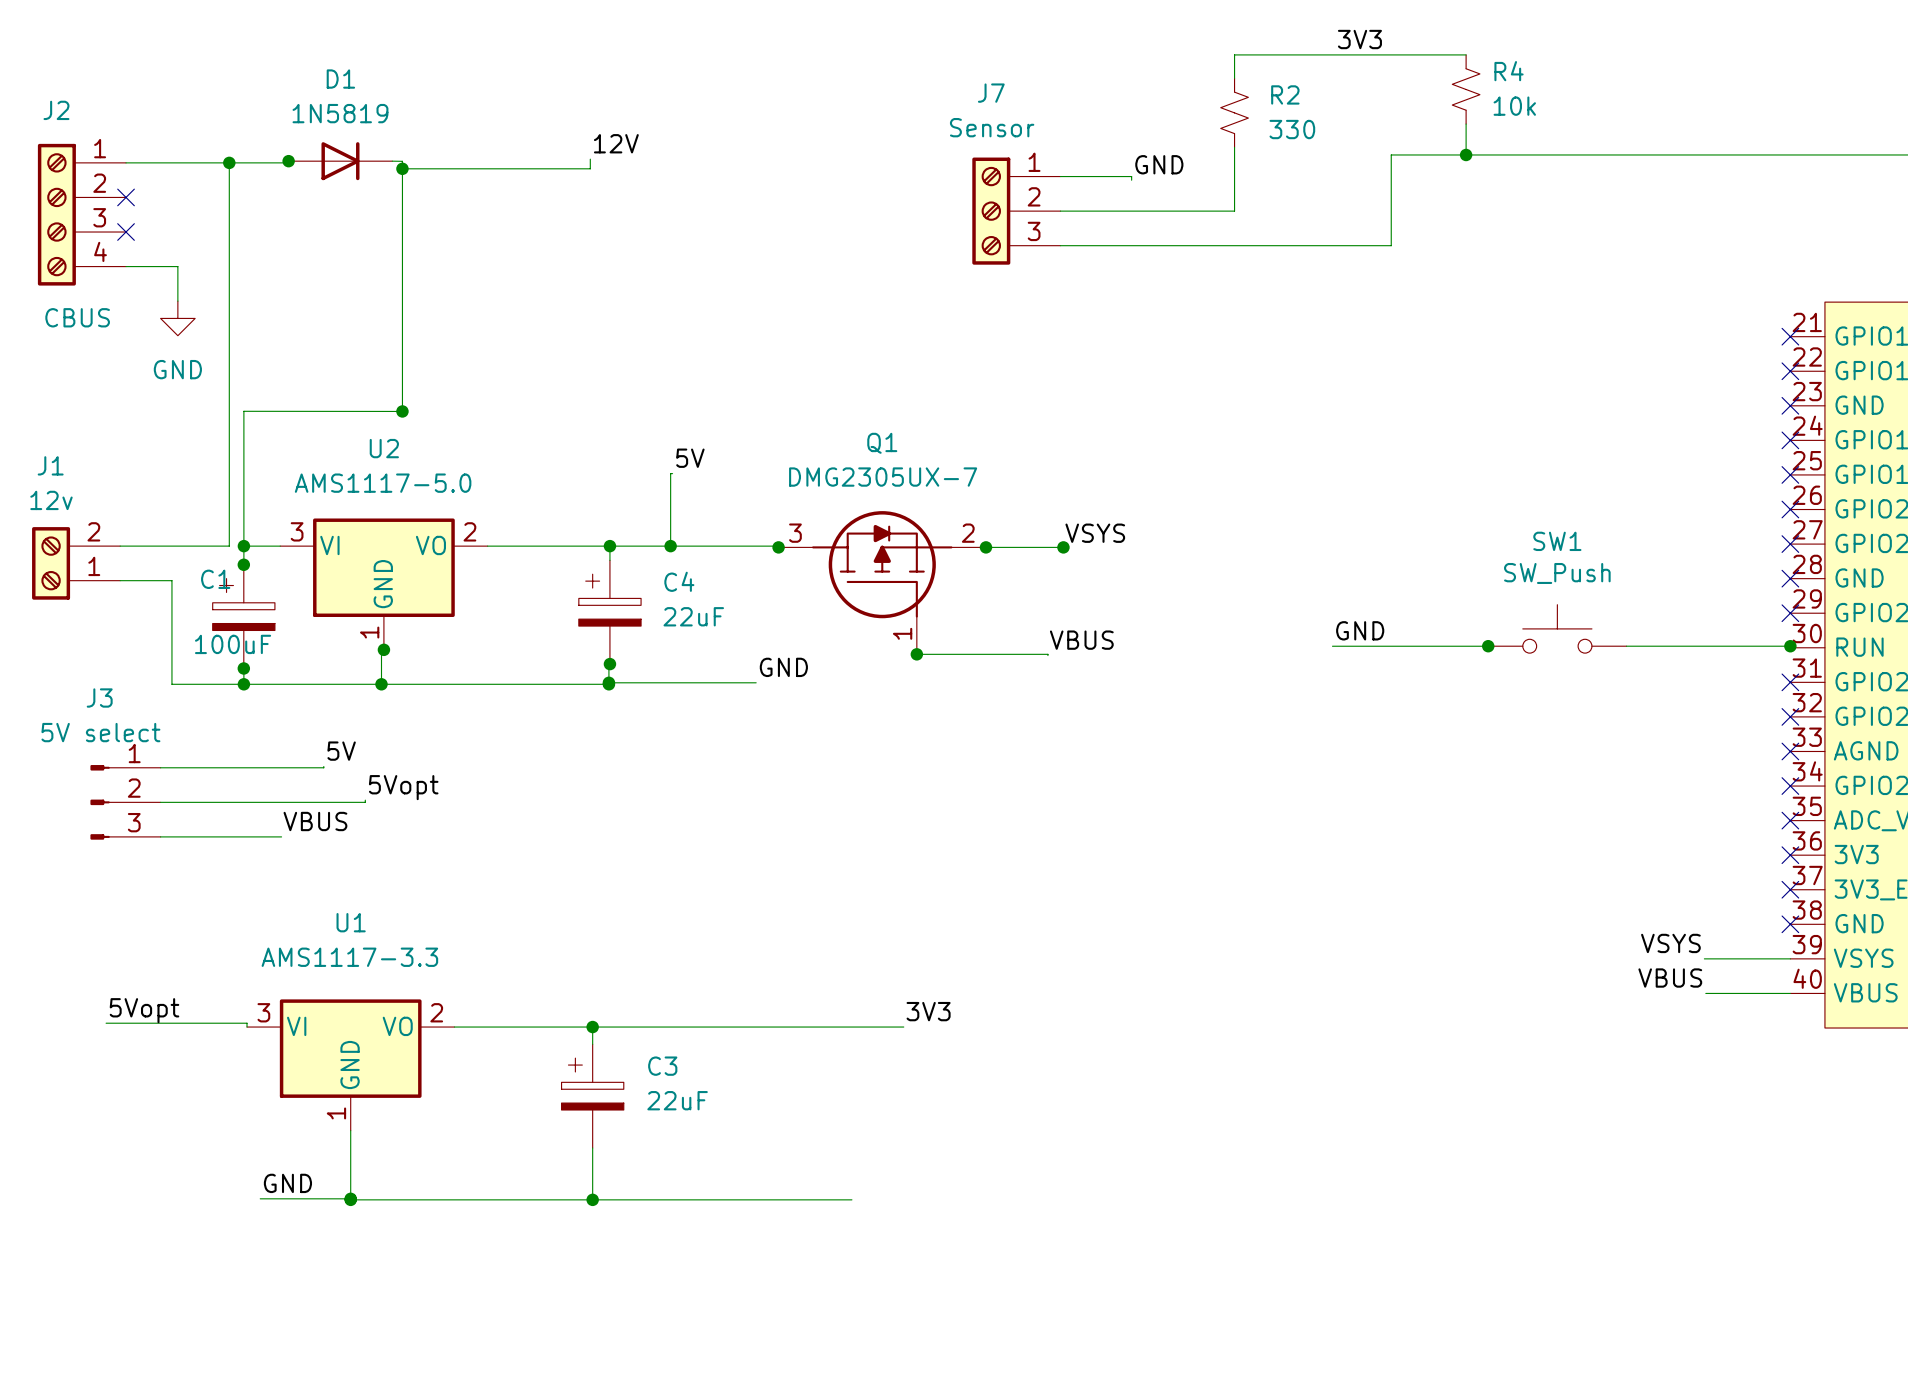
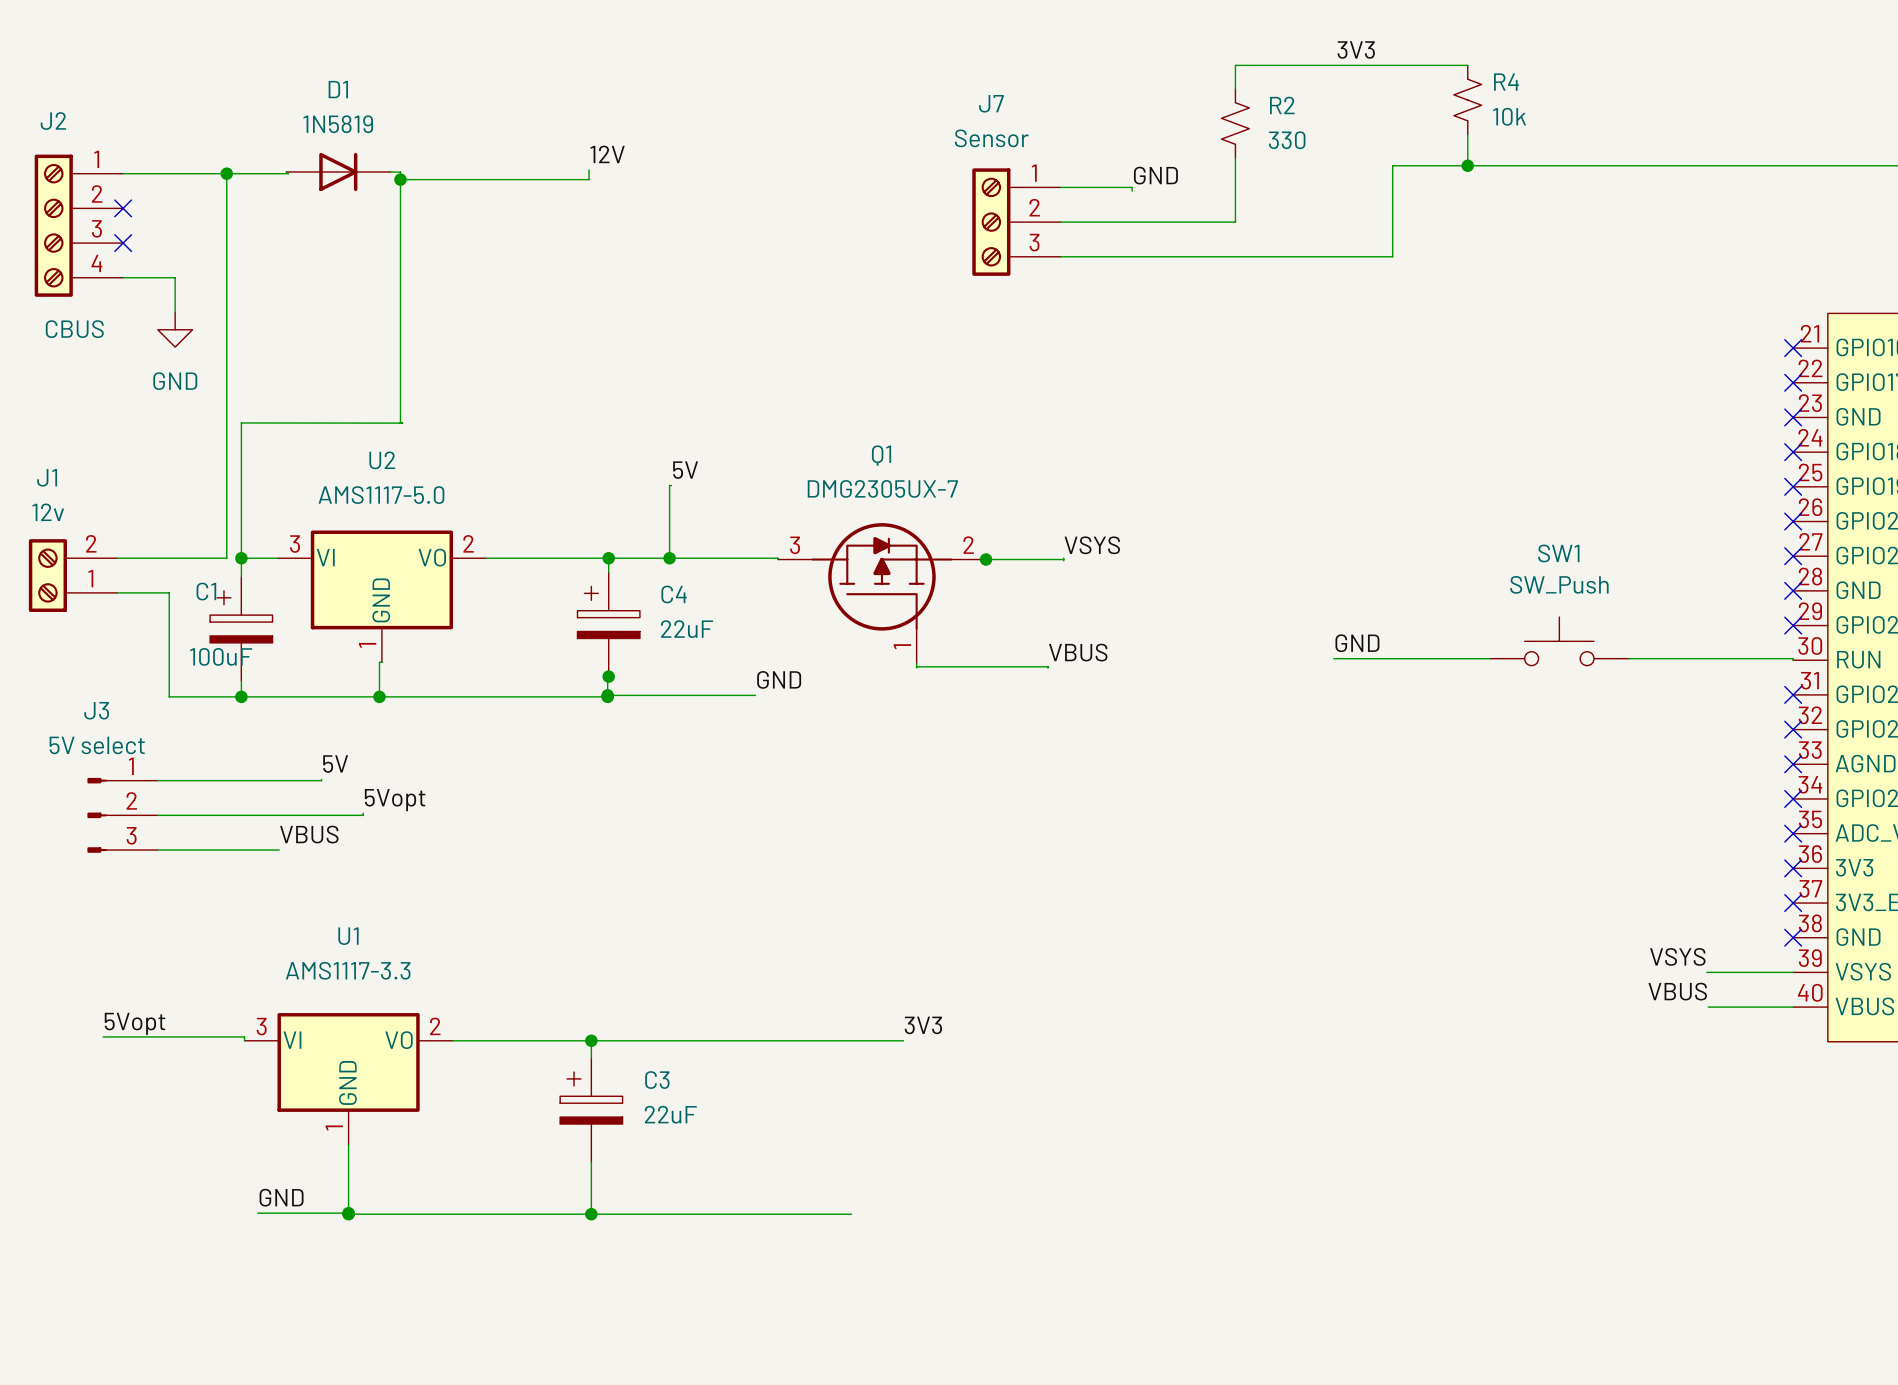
junction: (288, 161) -> none
junction: (402, 411) -> none
junction: (778, 547) -> none
junction: (1063, 547) -> none
junction: (243, 564) -> none
junction: (1488, 646) -> none
junction: (1790, 646) -> none
junction: (383, 649) -> none
junction: (916, 654) -> none
junction: (243, 668) -> none

